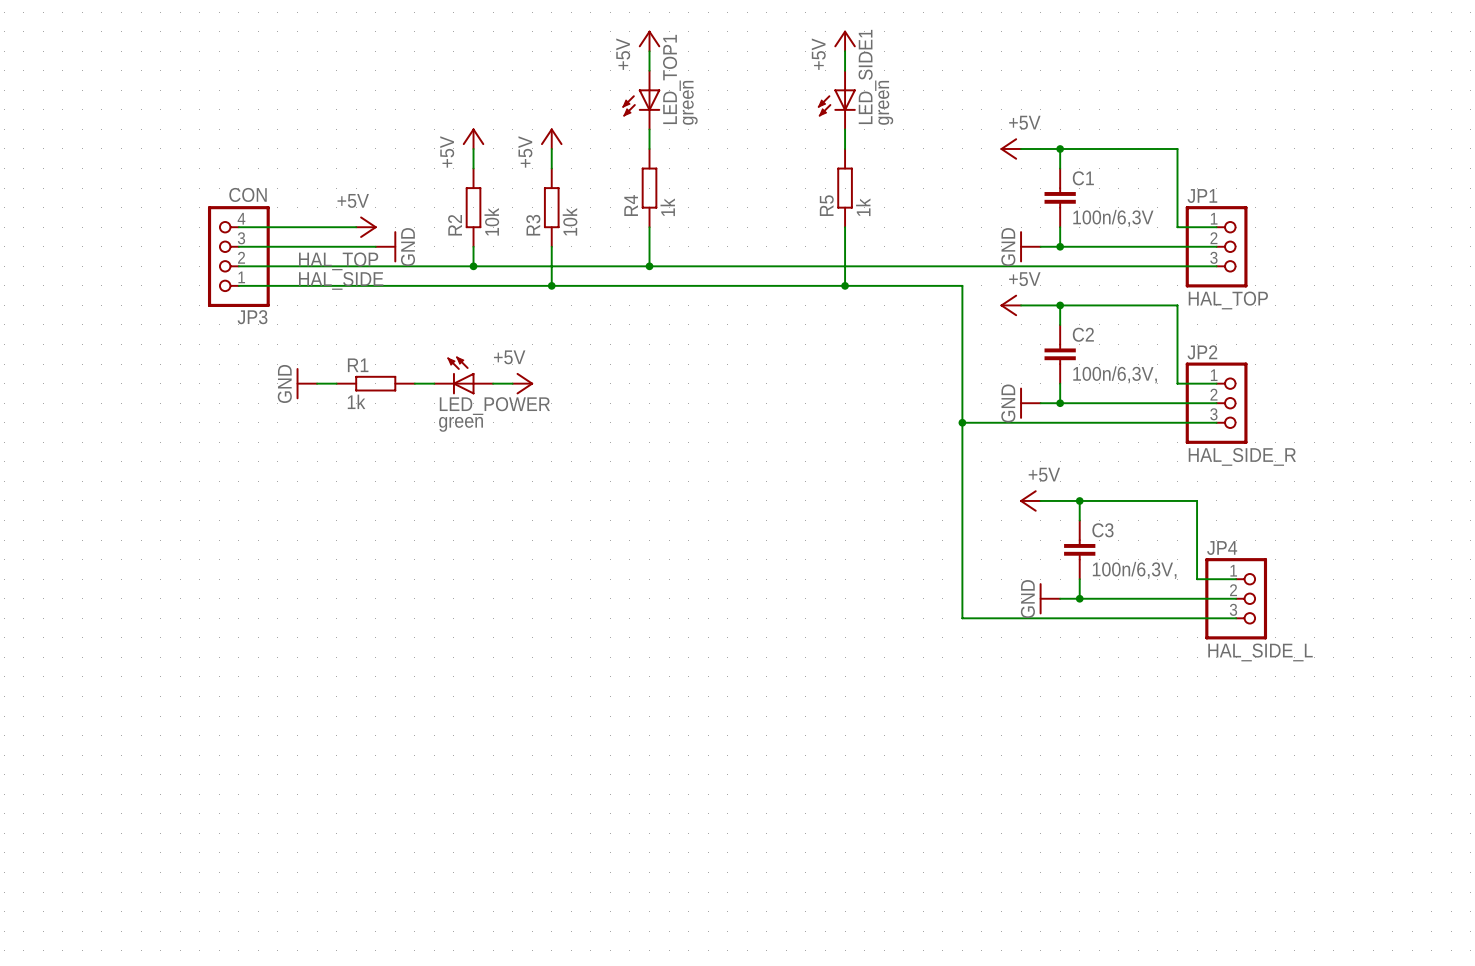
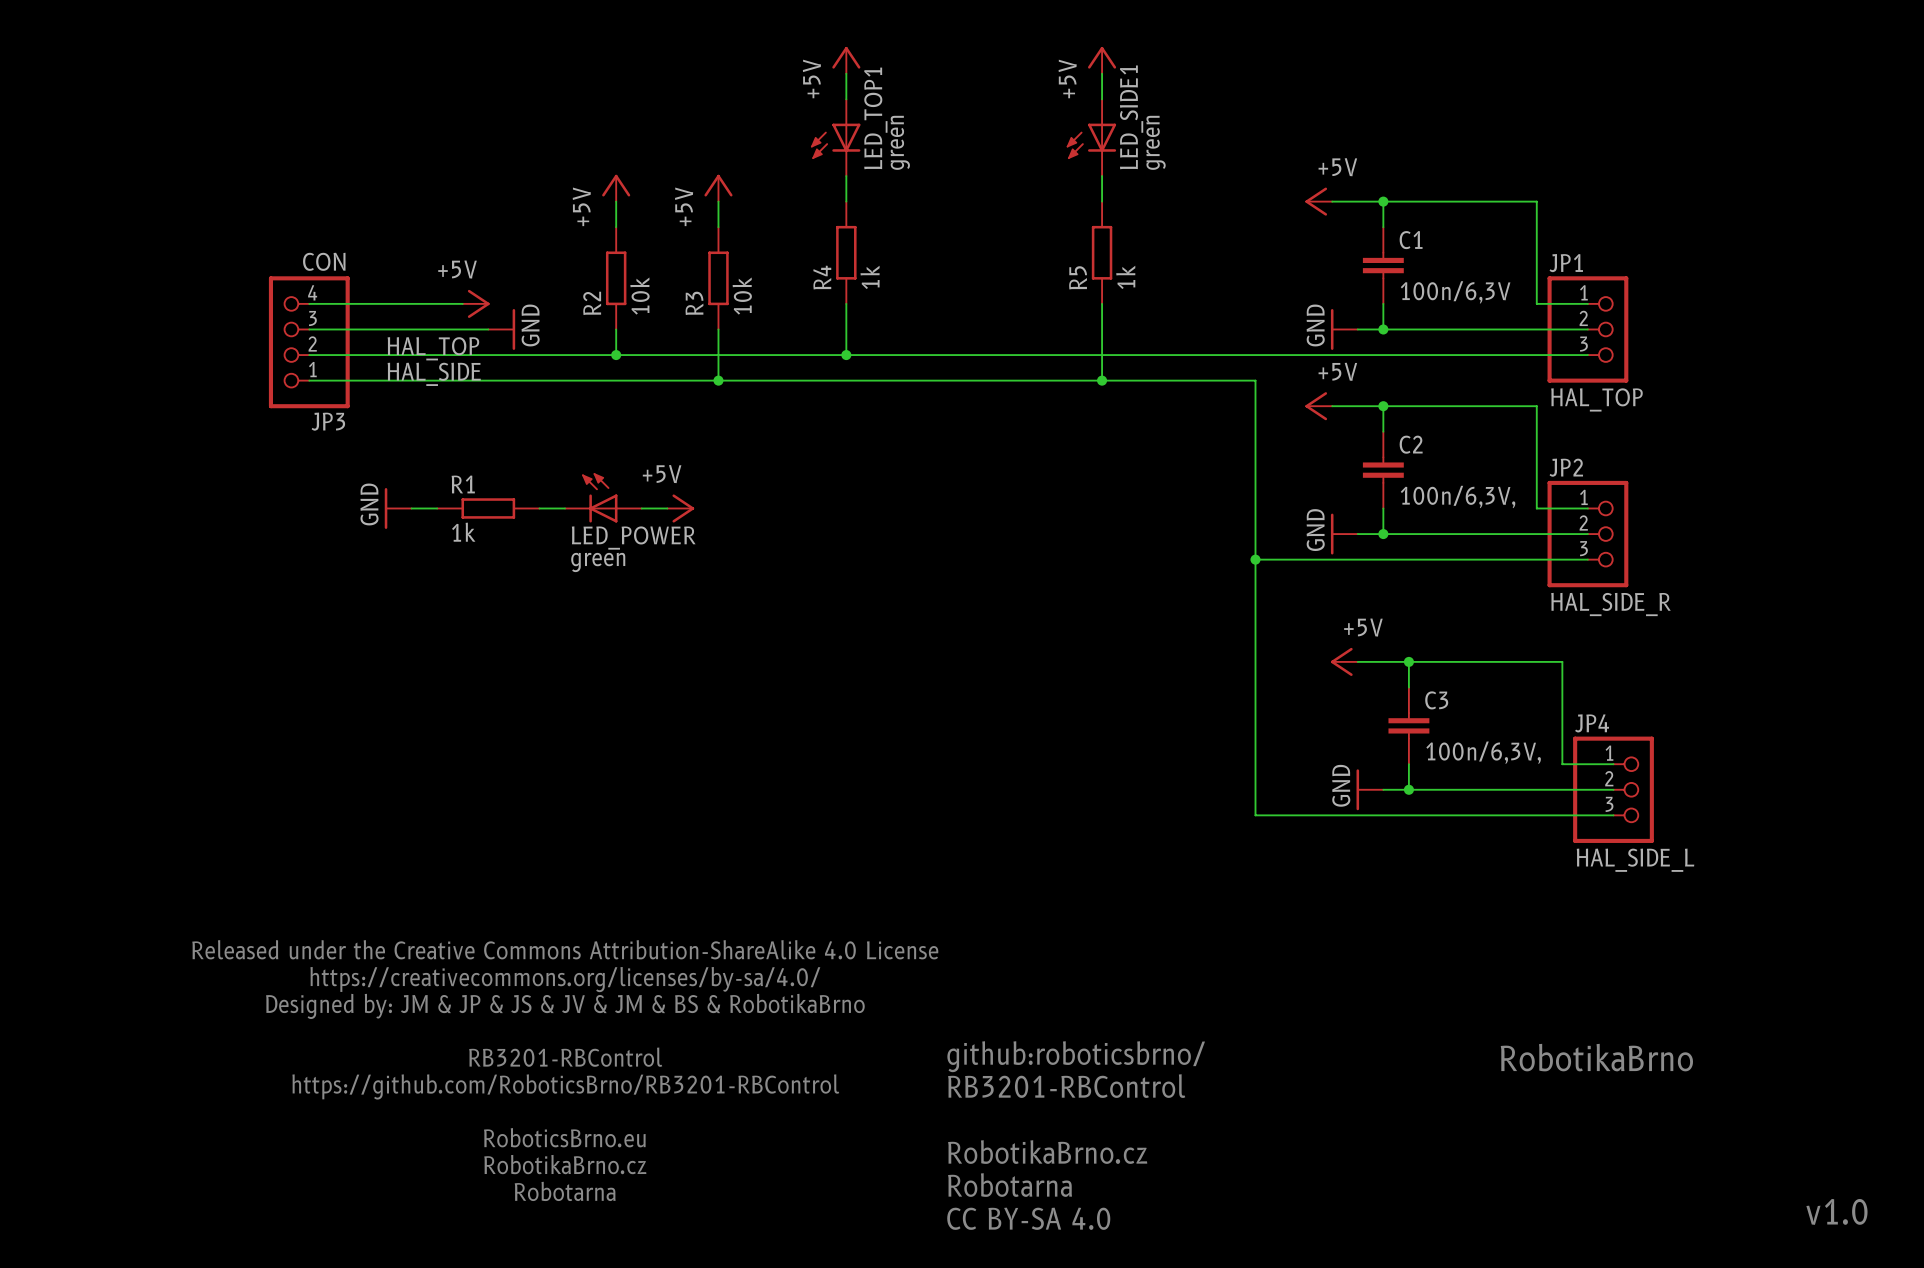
text: none -> Released under the Creative Commons Attribution-ShareAlike 4.0 License (565, 949)
text: none -> https://creativecommons.org/licenses/by-sa/4.0/ (565, 979)
text: none -> Designed by: JM & JP & JS & JV & JM & BS & RobotikaBrno (565, 1006)
text: none -> github:roboticsbrno/ (1076, 1056)
text: none -> RB3201-RBControl (565, 1057)
text: none -> RobotikaBrno (1596, 1057)
text: none -> https://github.com/RoboticsBrno/RB3201-RBControl (565, 1086)
text: none -> RB3201-RBControl (1066, 1086)
text: none -> RoboticsBrno.eu (564, 1137)
text: none -> RobotikaBrno.cz (1047, 1152)
text: none -> RobotikaBrno.cz (565, 1164)
text: none -> Robotarna (1010, 1185)
text: none -> Robotarna (565, 1191)
text: none -> v1.0 (1836, 1211)
text: none -> CC BY-SA 4.0 (1028, 1218)

